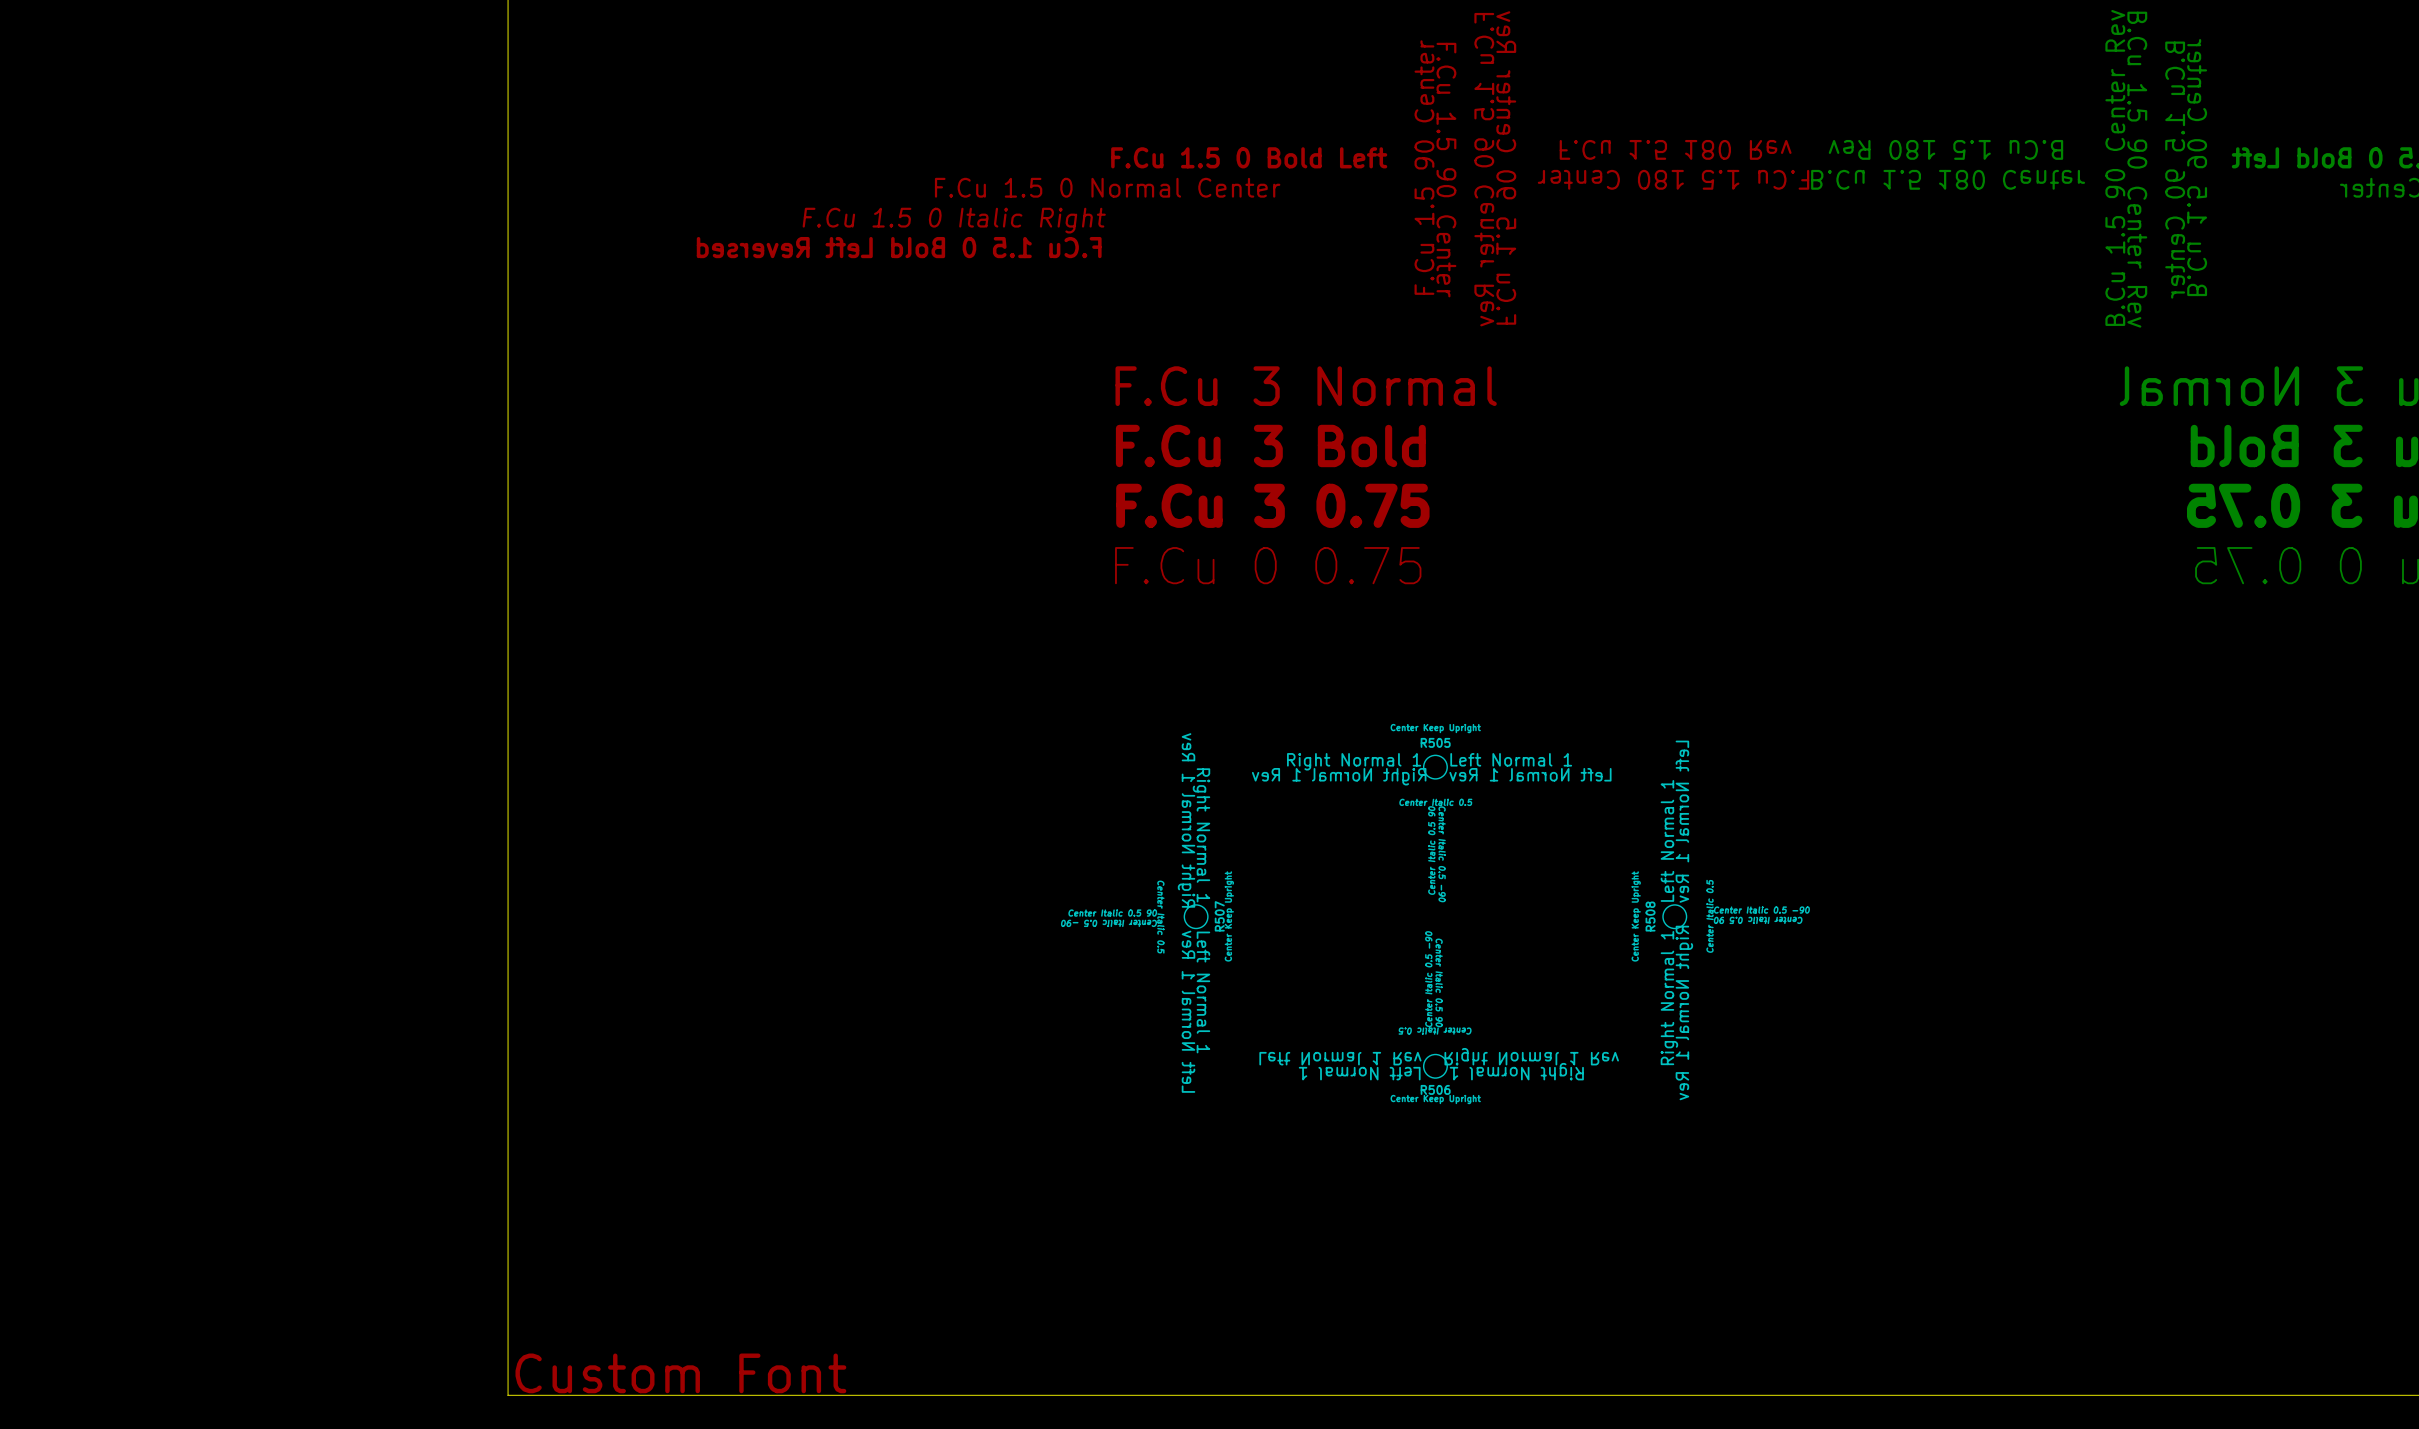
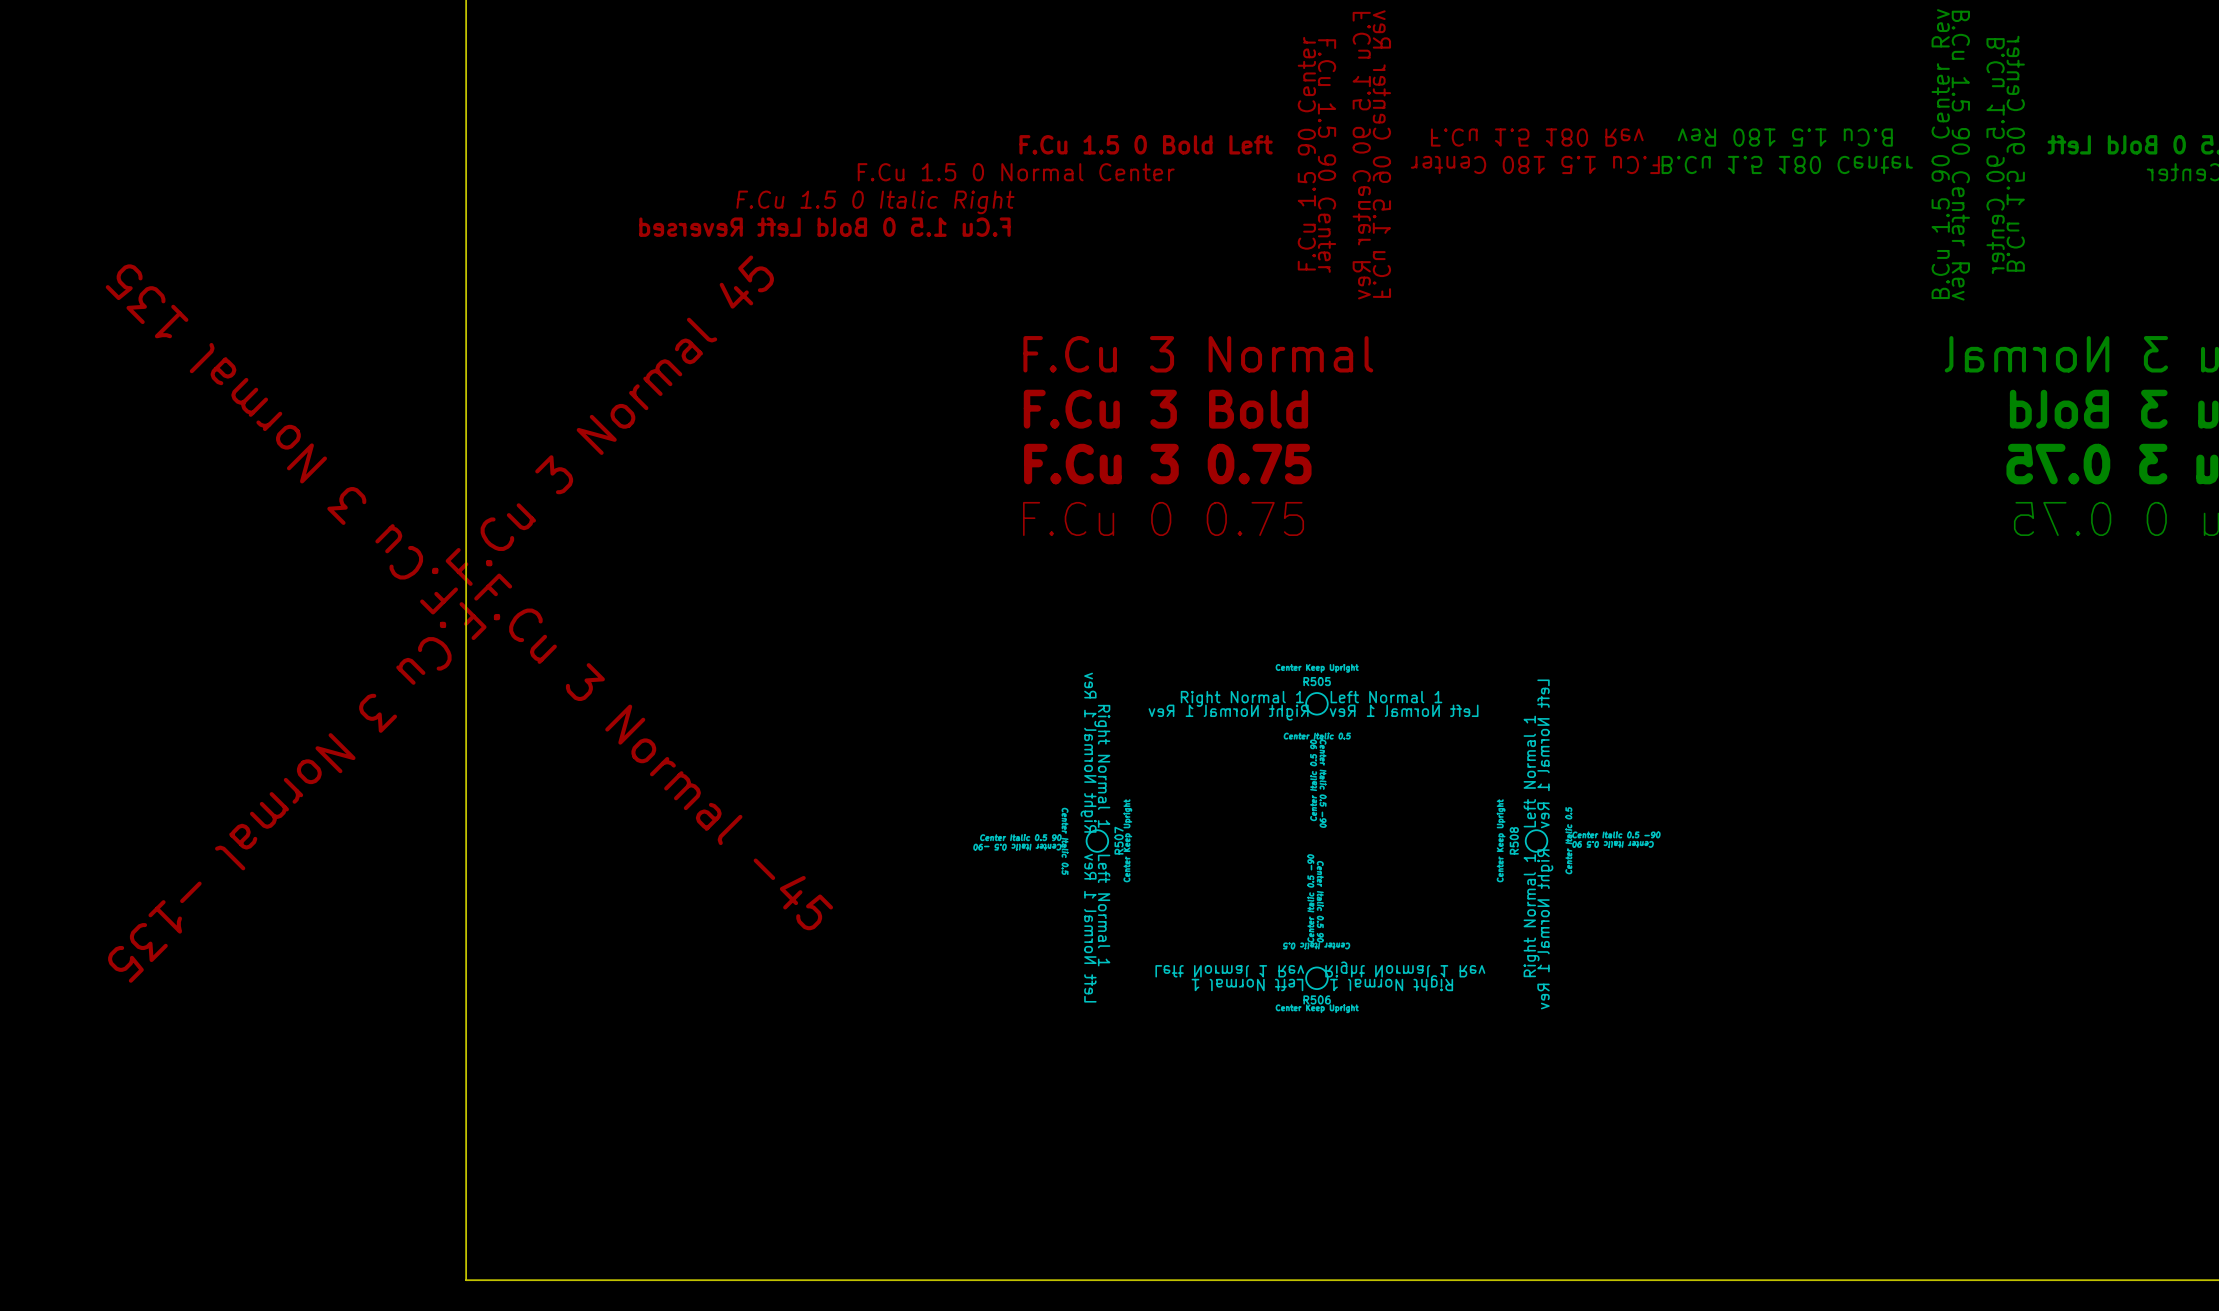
text: none -> F.Cu 3 Normal 45 (609, 420)
text: none -> F.Cu 3 Normal 135 (281, 439)
text: none -> F.Cu 3 Normal -45 (653, 751)
text: none -> F.Cu 3 Normal -135 (297, 792)
text: Custom Font (680, 1373) -> none

